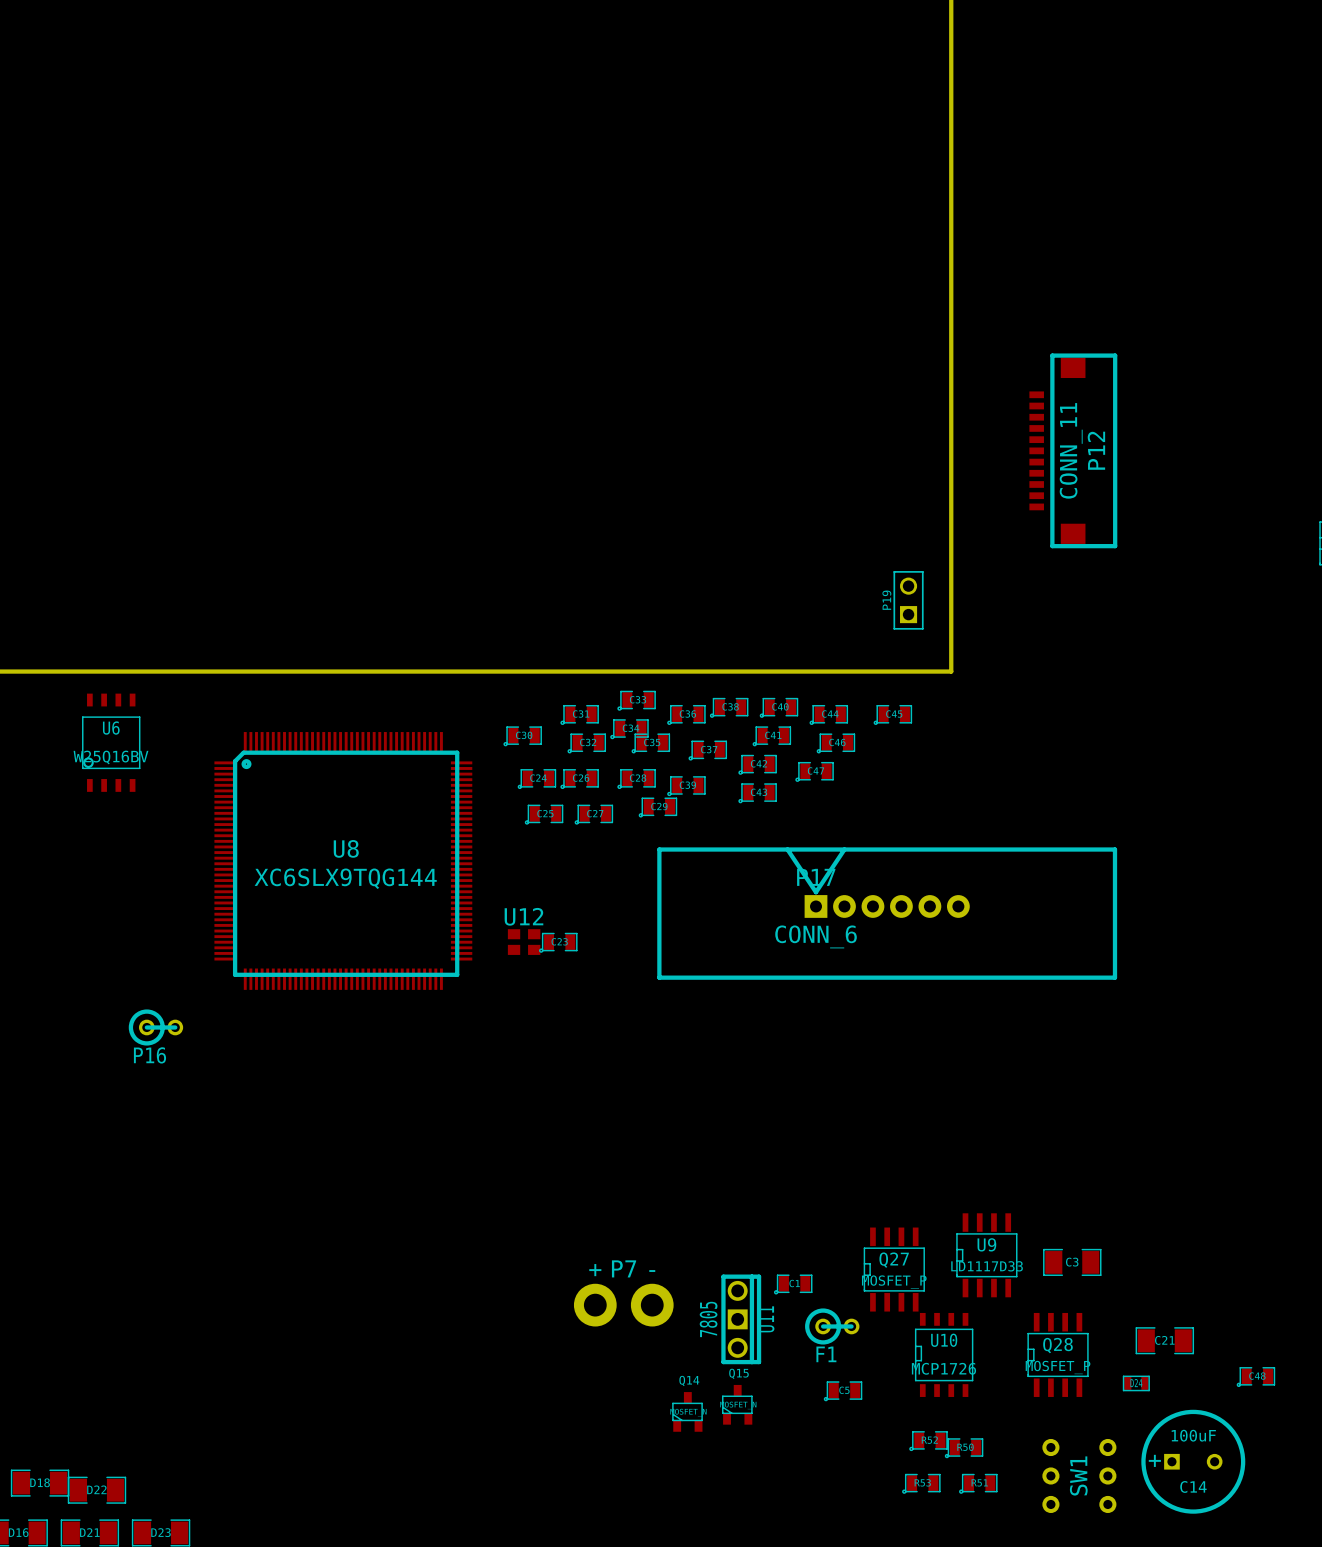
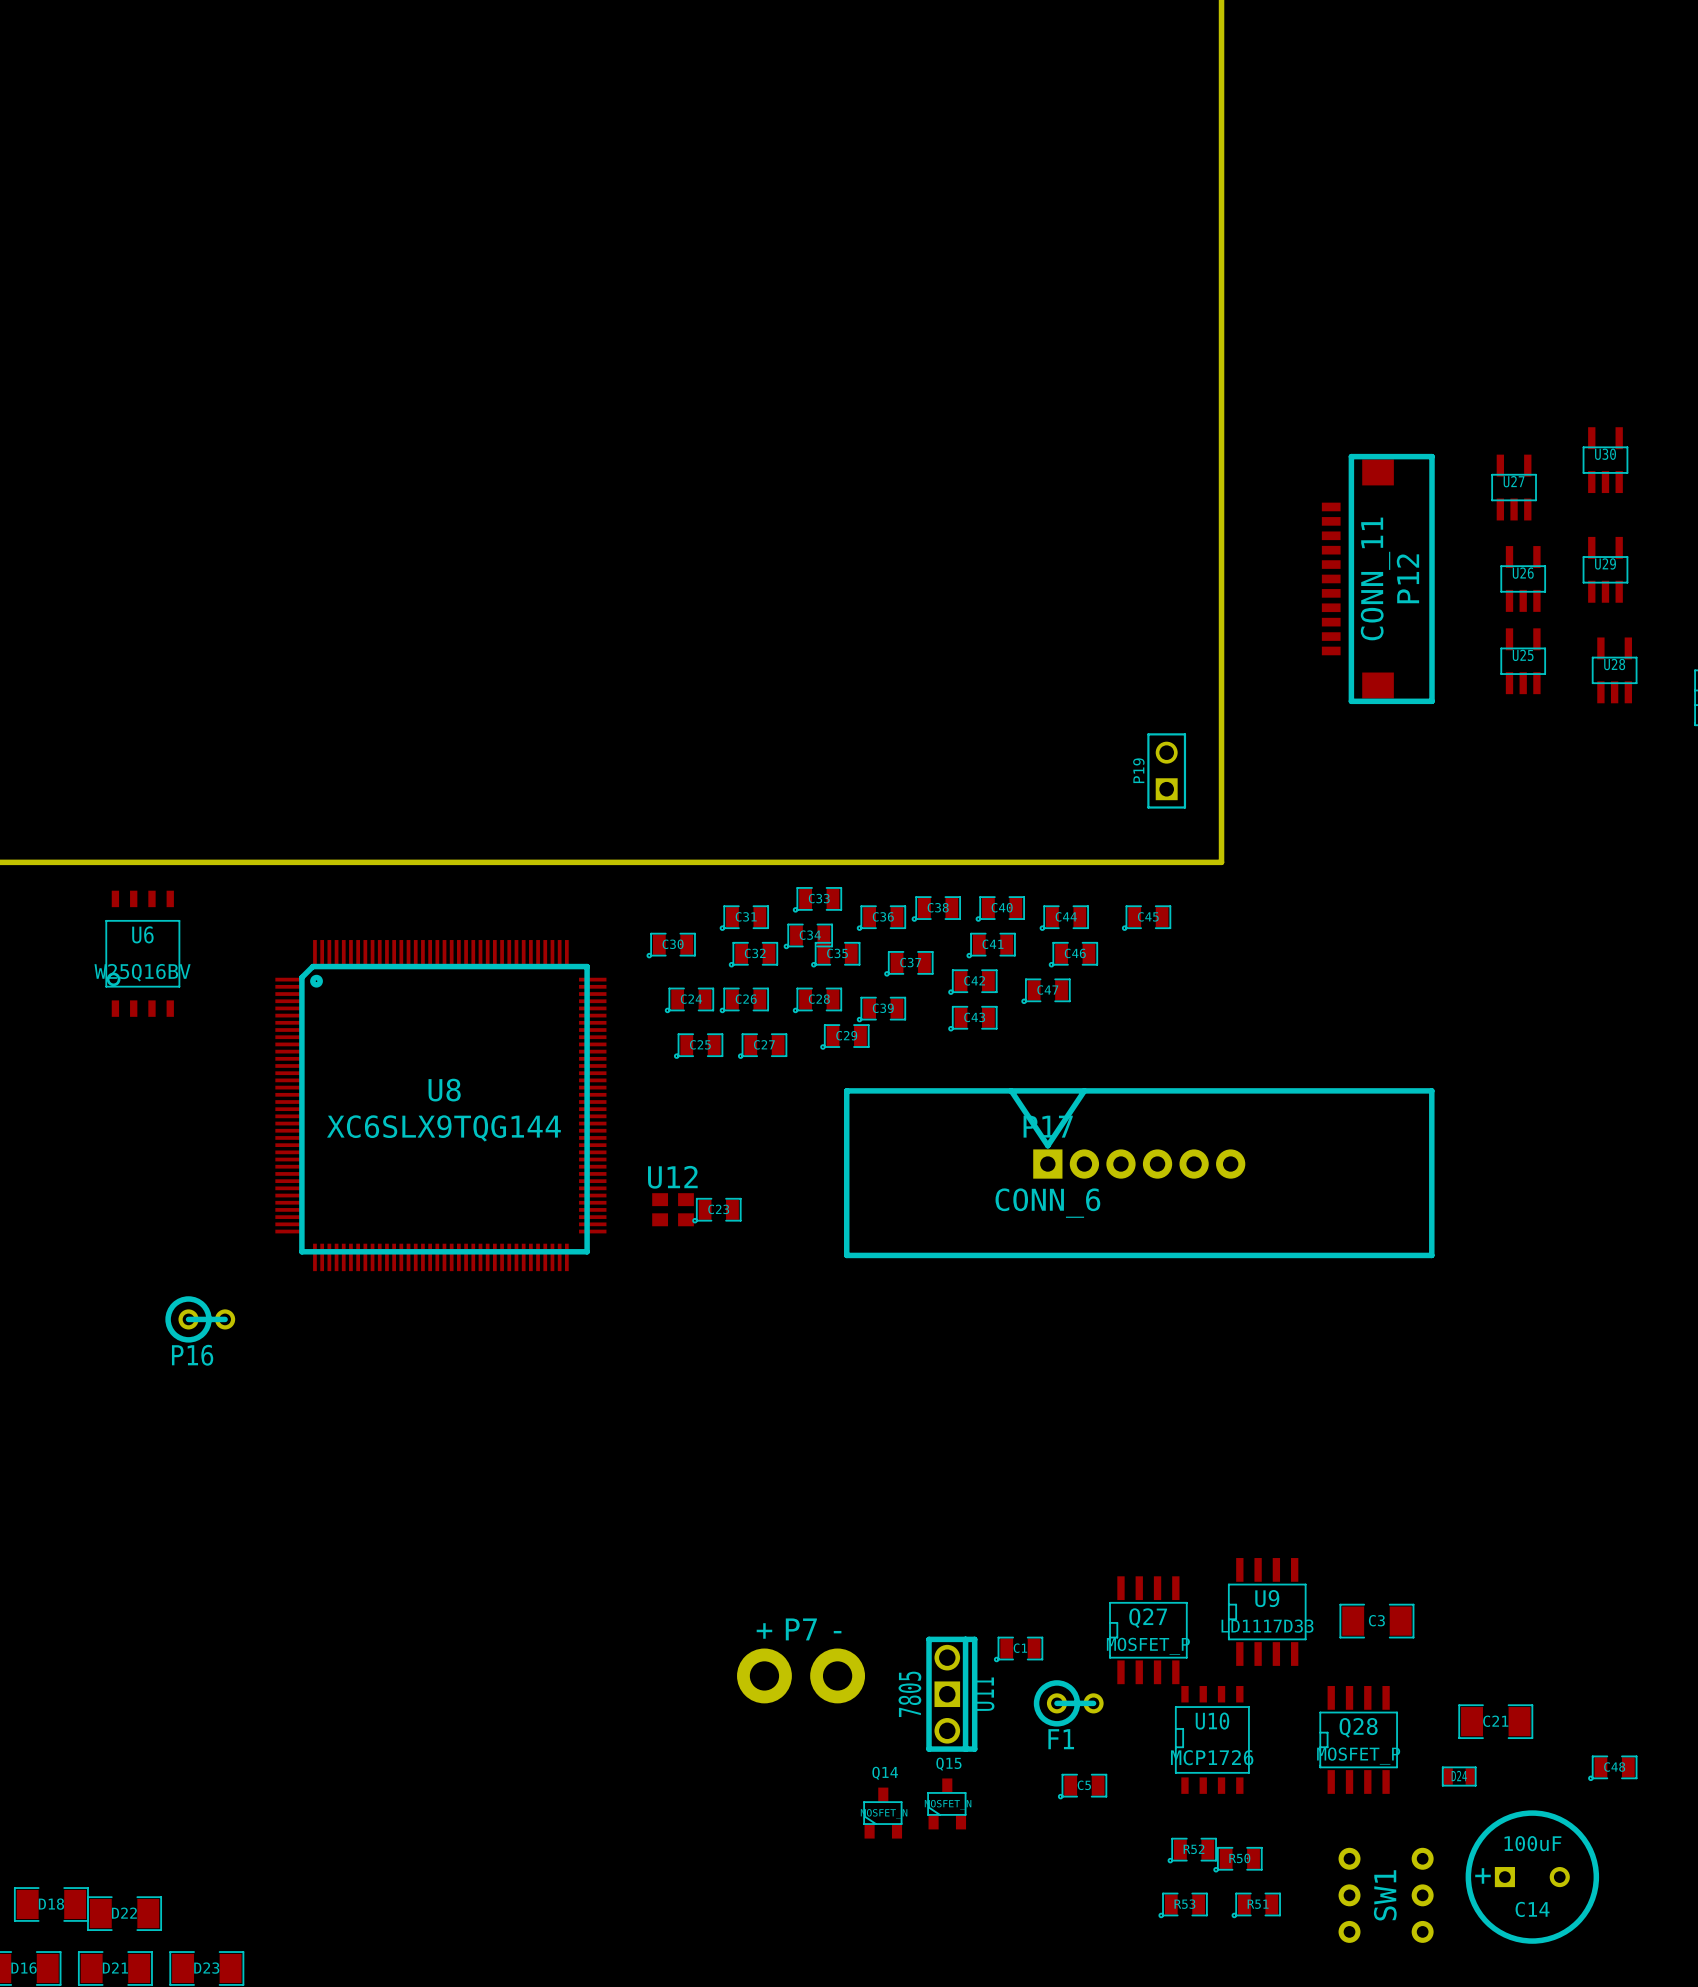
U30: none -> (1605, 460)
U27: none -> (1514, 487)
U29: none -> (1605, 569)
U26: none -> (1523, 578)
U25: none -> (1523, 661)
U28: none -> (1614, 670)

